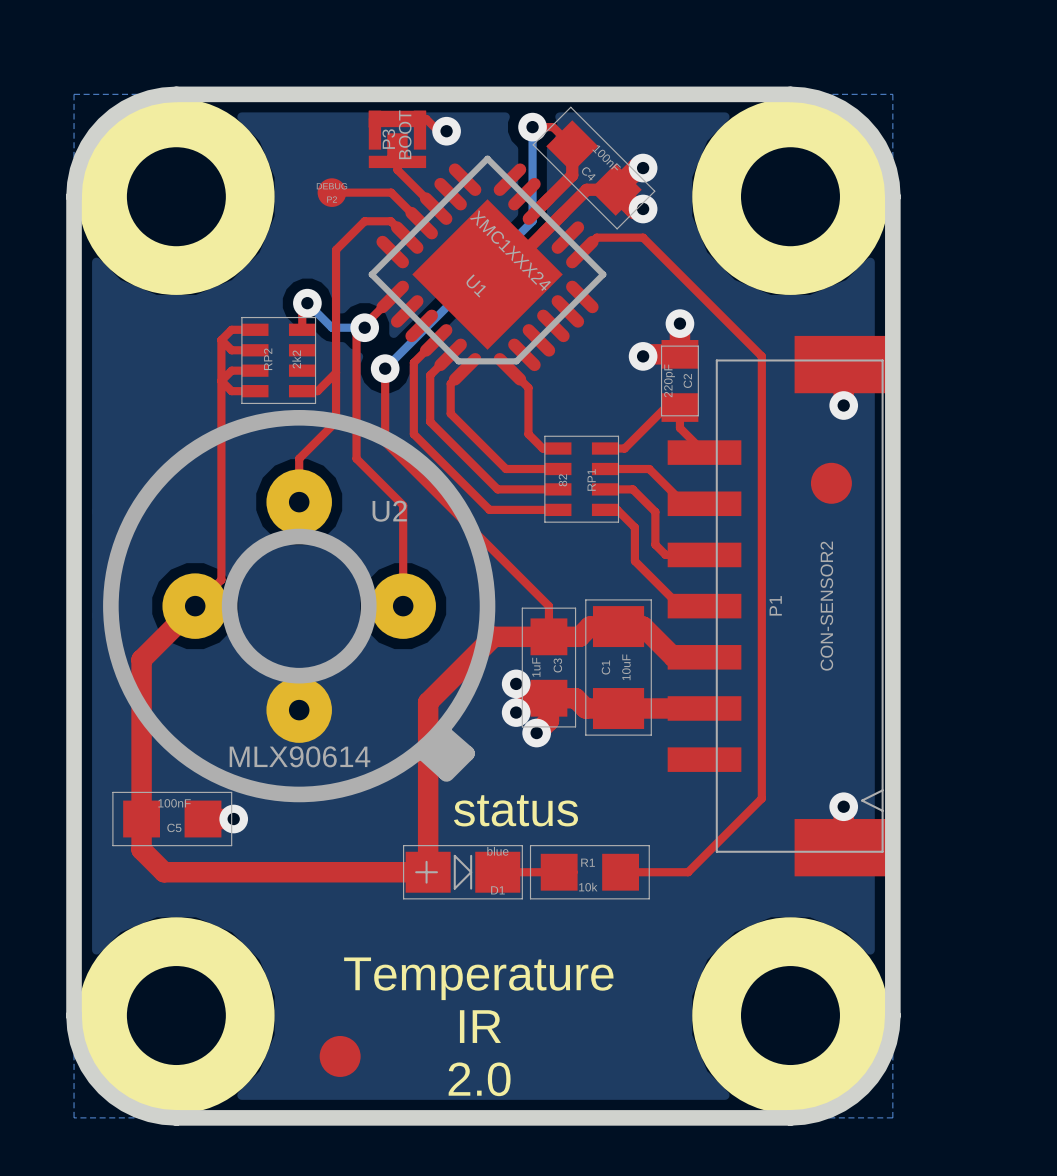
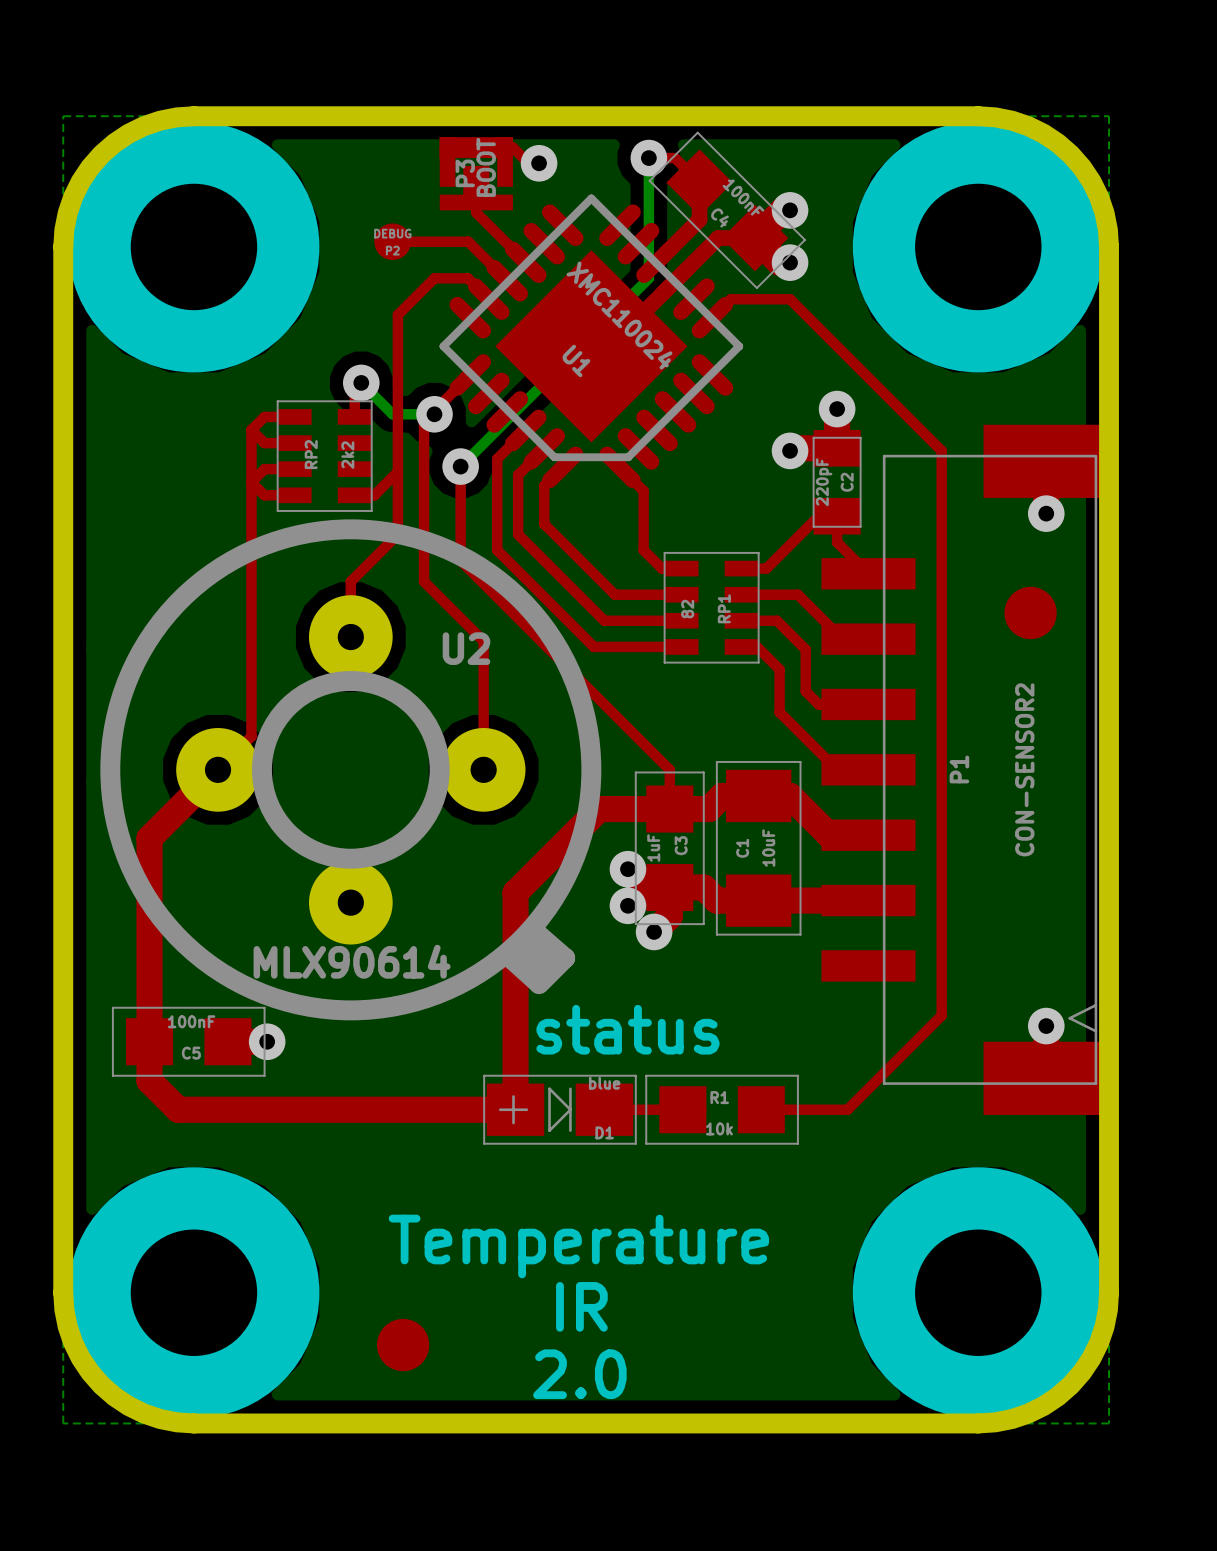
U1 value: XMC1XXX24 (510, 250) -> XMC110024 (619, 315)

